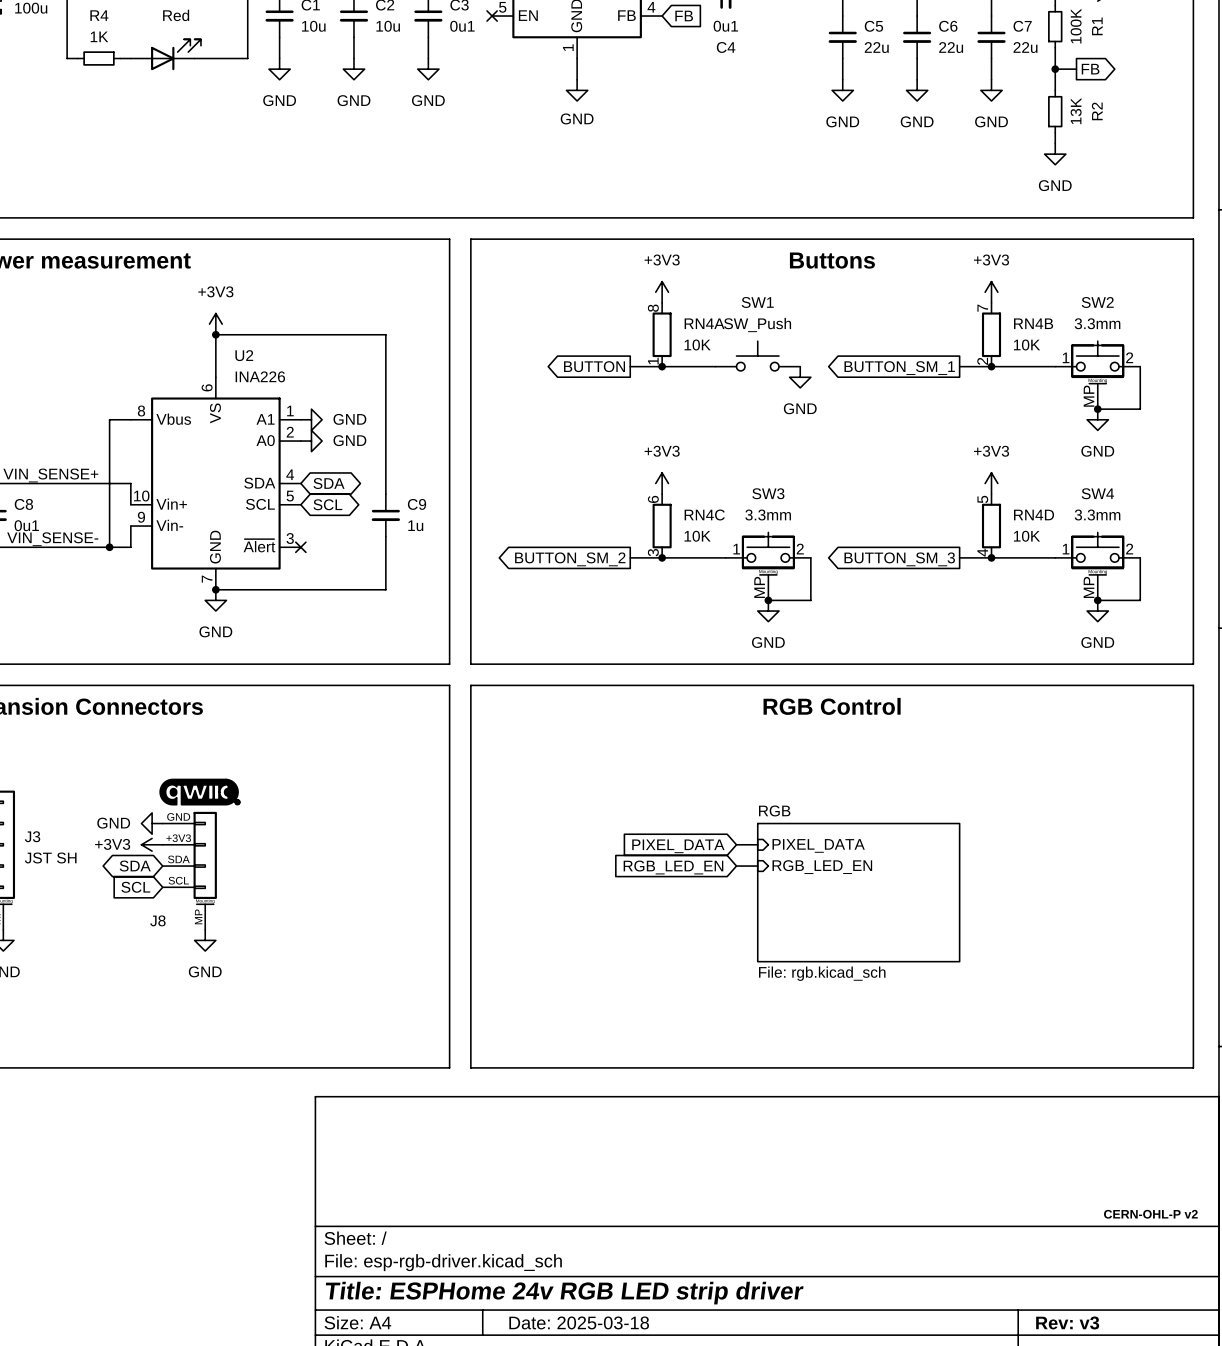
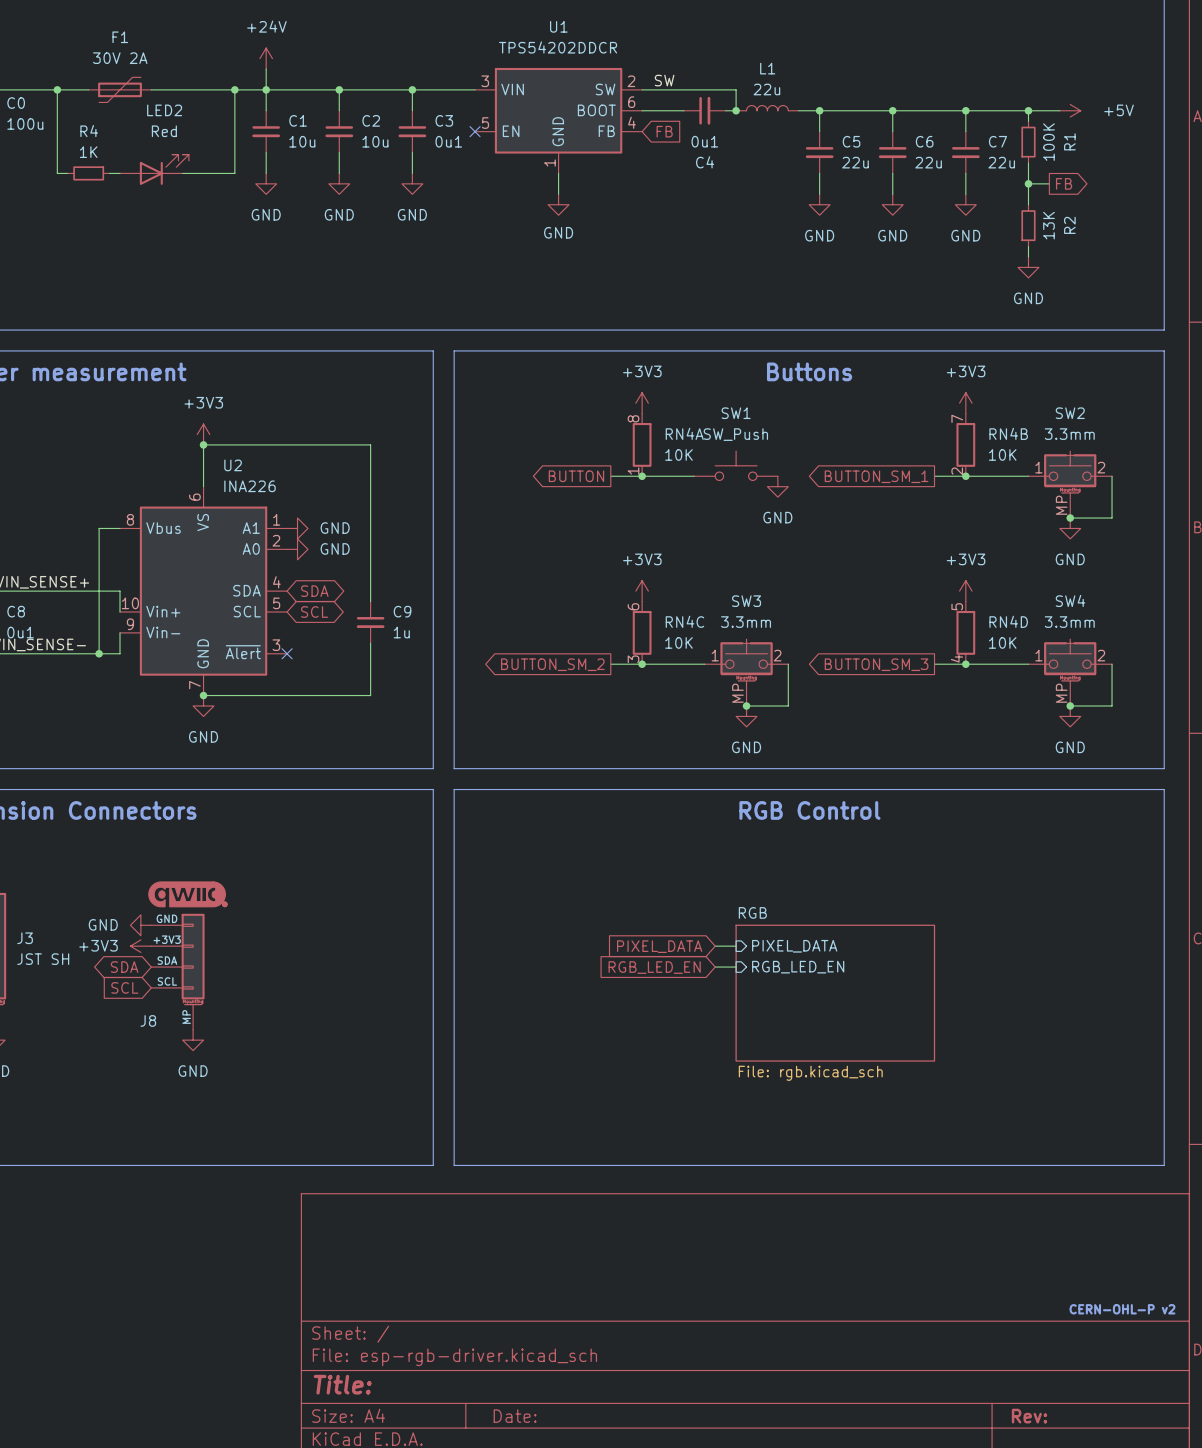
title block: Title: ESPHome 24v RGB LED strip driver (564, 1293) -> Title: (342, 1384)
title block: Date: 2025-03-18 (579, 1322) -> Date: (515, 1416)
title block: Rev: v3 (1067, 1322) -> Rev: (1029, 1416)

